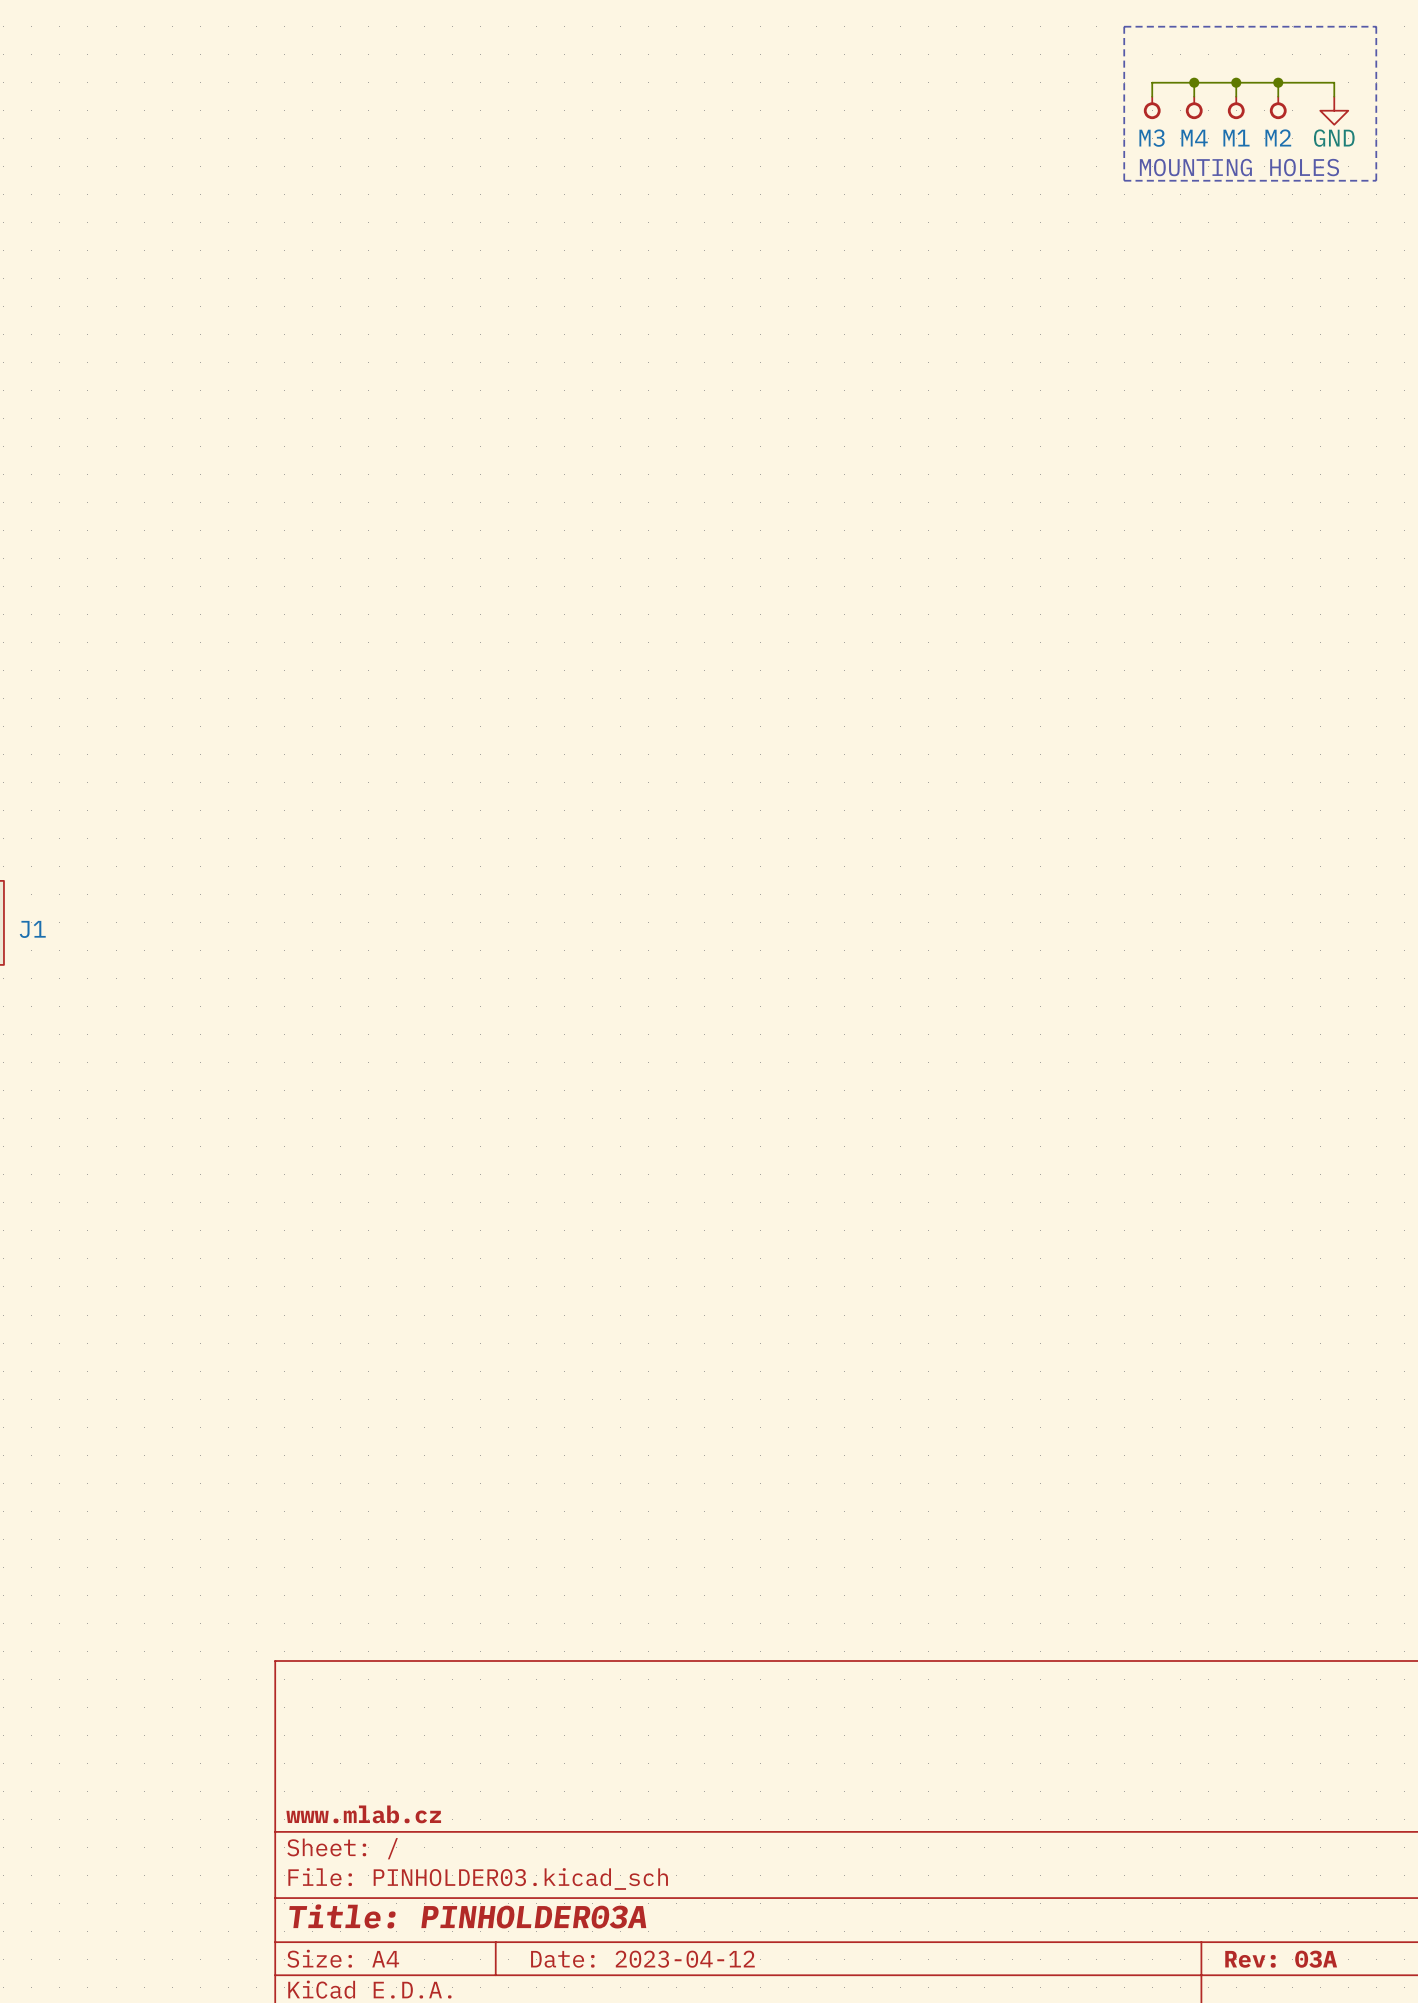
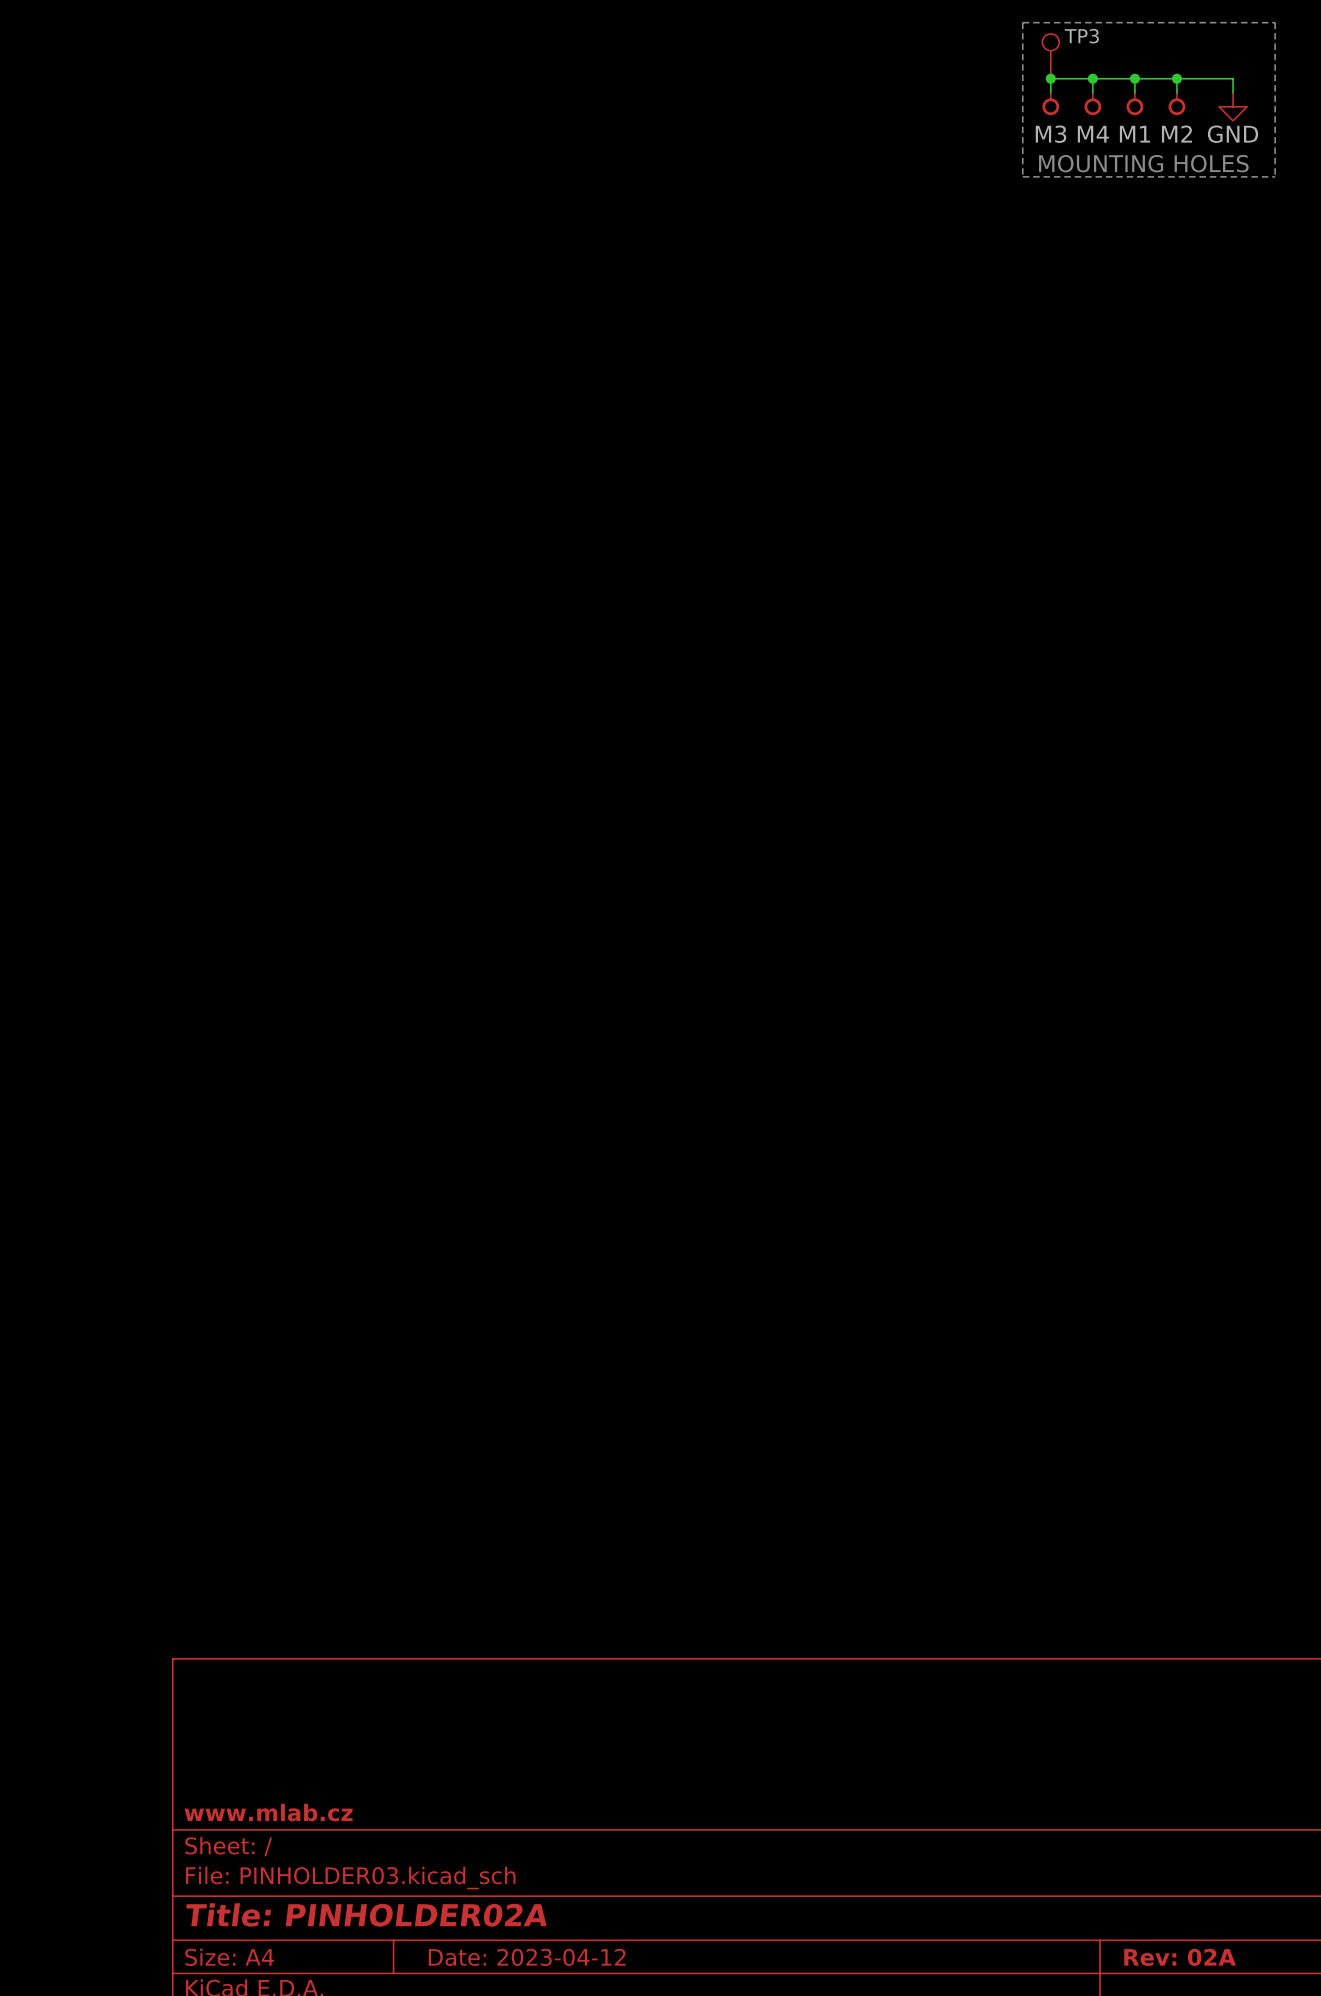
TP3: none -> (1050, 56)
junction: none -> (1050, 78)
title block: Title: PINHOLDER03A (467, 1916) -> Title: PINHOLDER02A (366, 1914)
title block: Rev: 03A (1281, 1959) -> Rev: 02A (1180, 1957)

